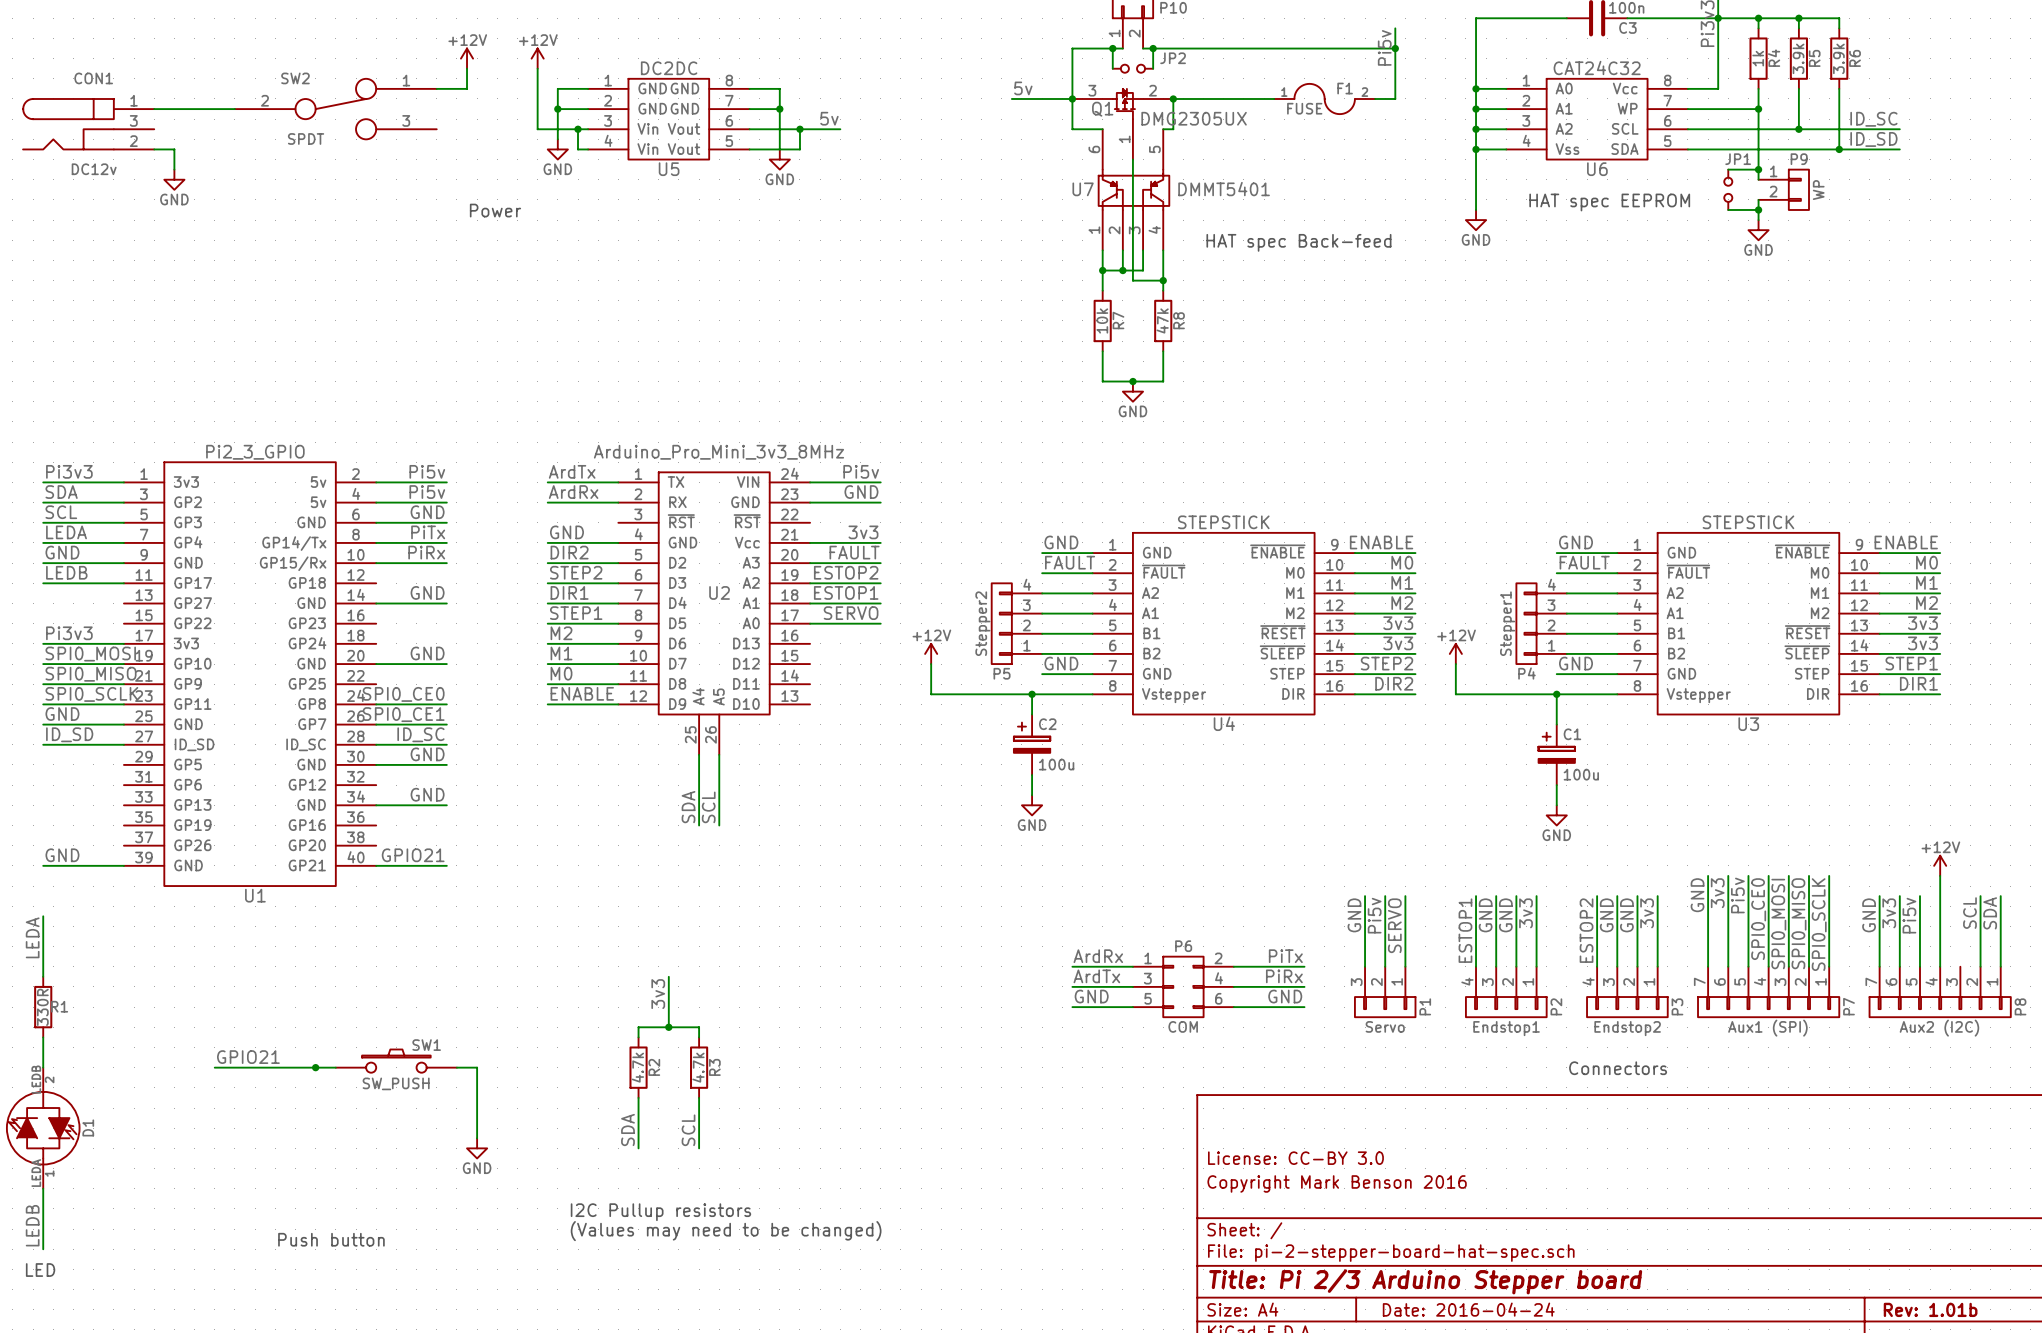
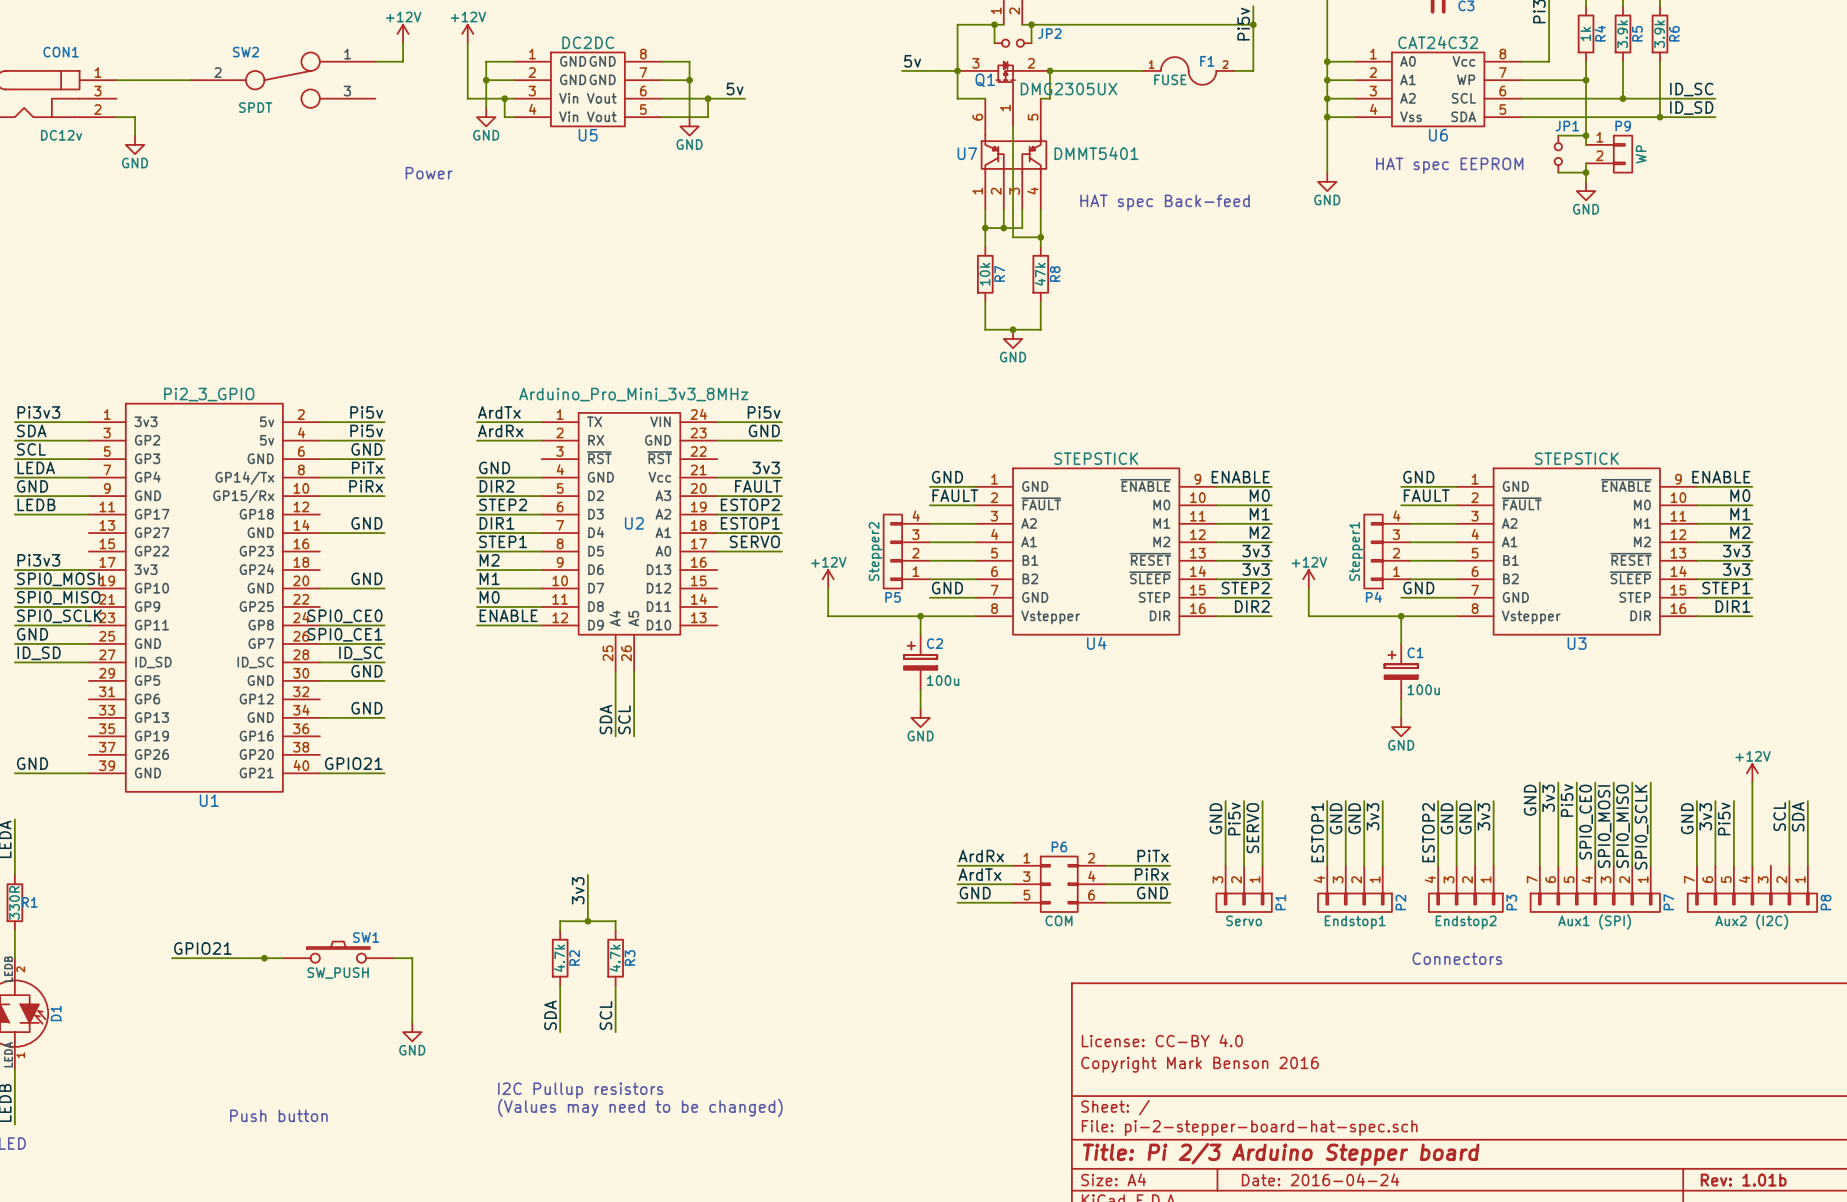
title block: License: CC-BY 3.0 (1295, 1158) -> License: CC-BY 4.0 (1162, 1040)

